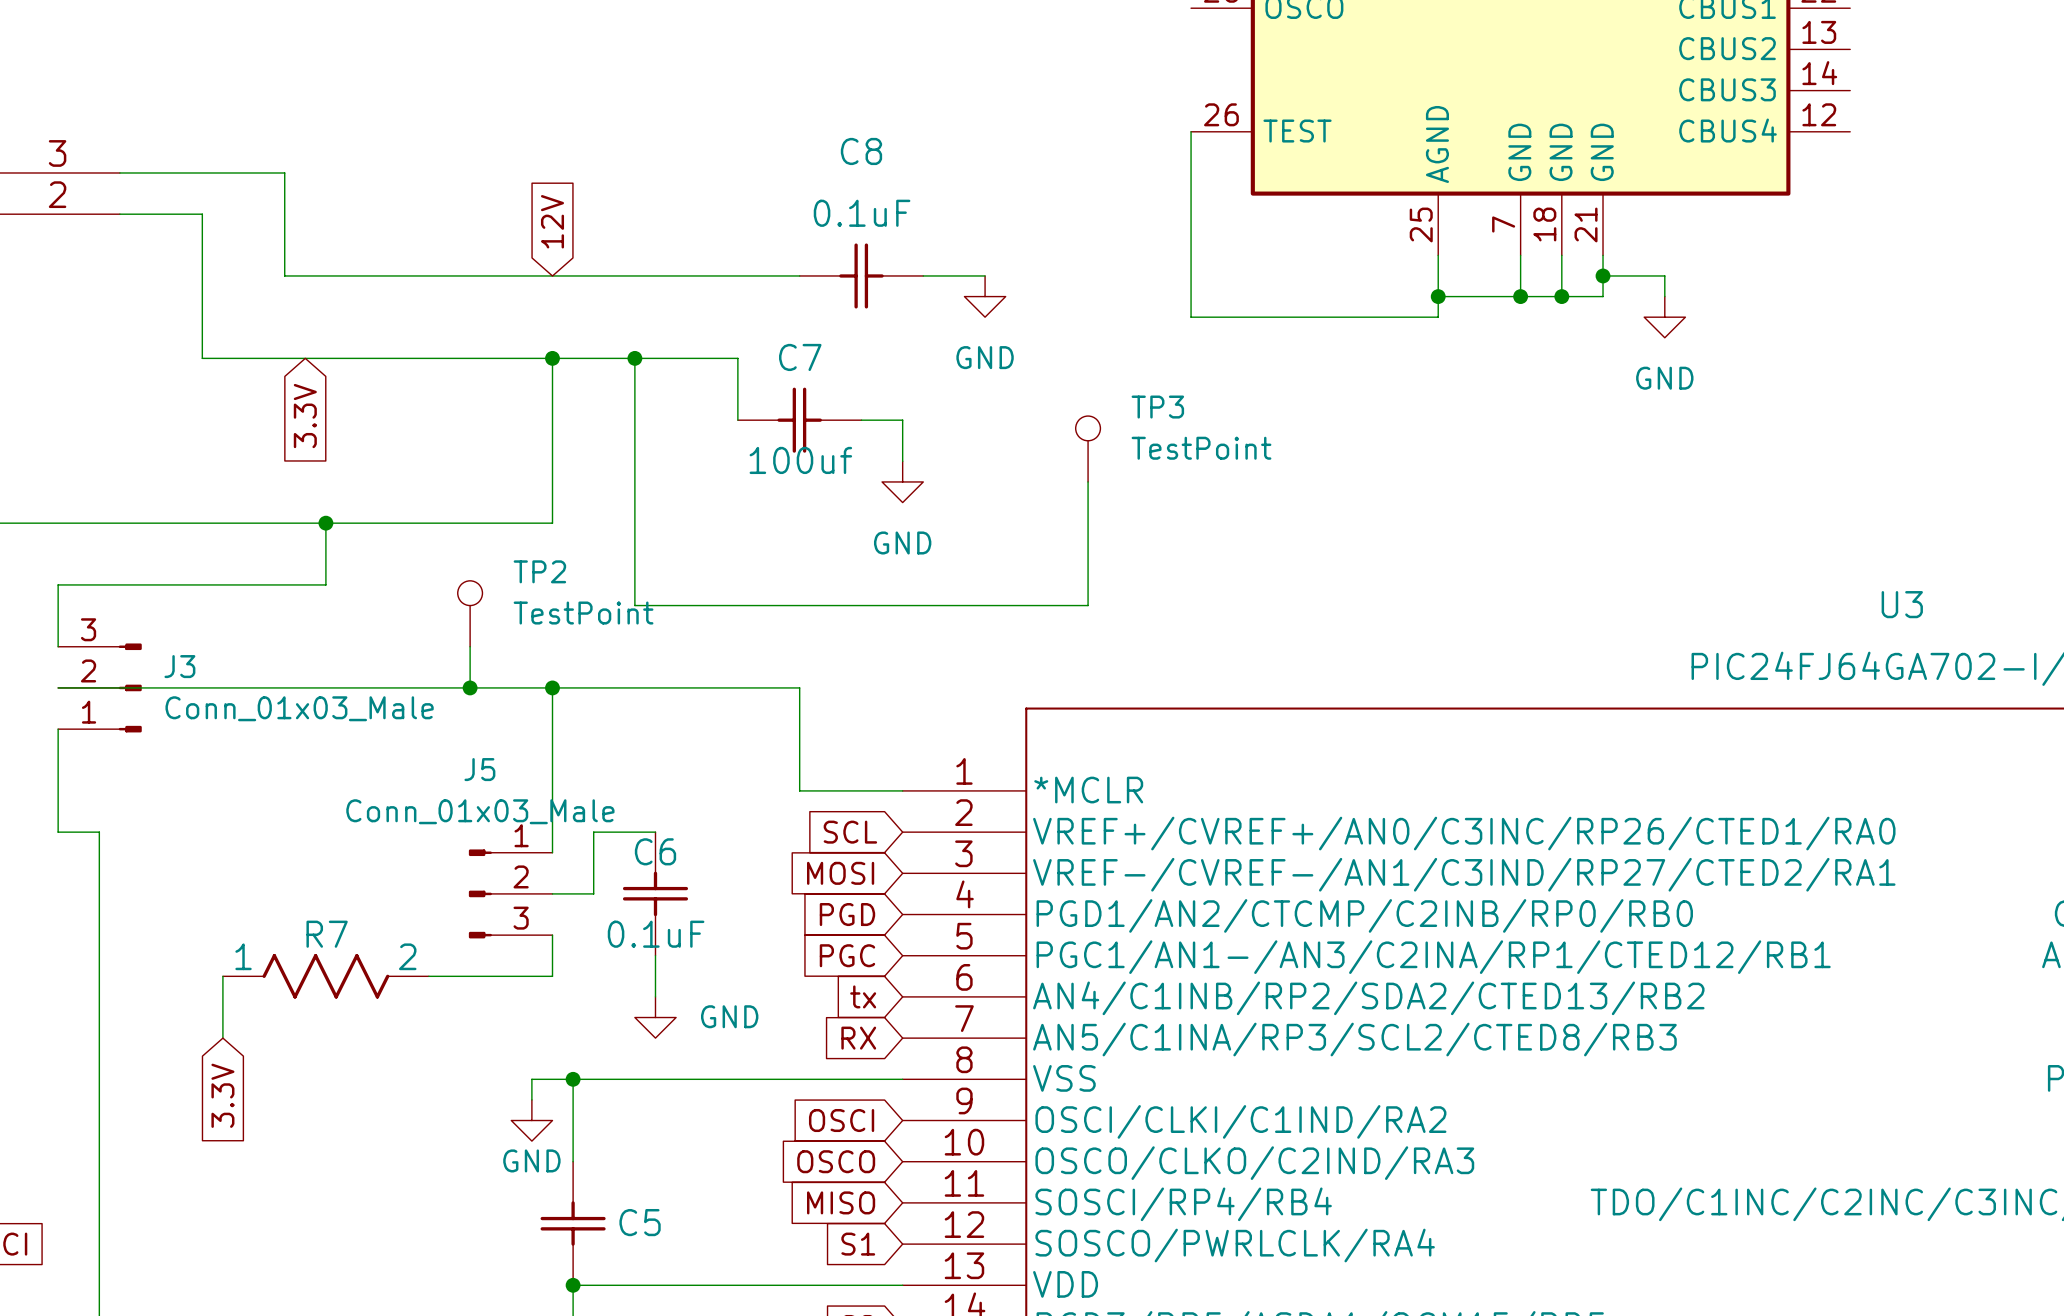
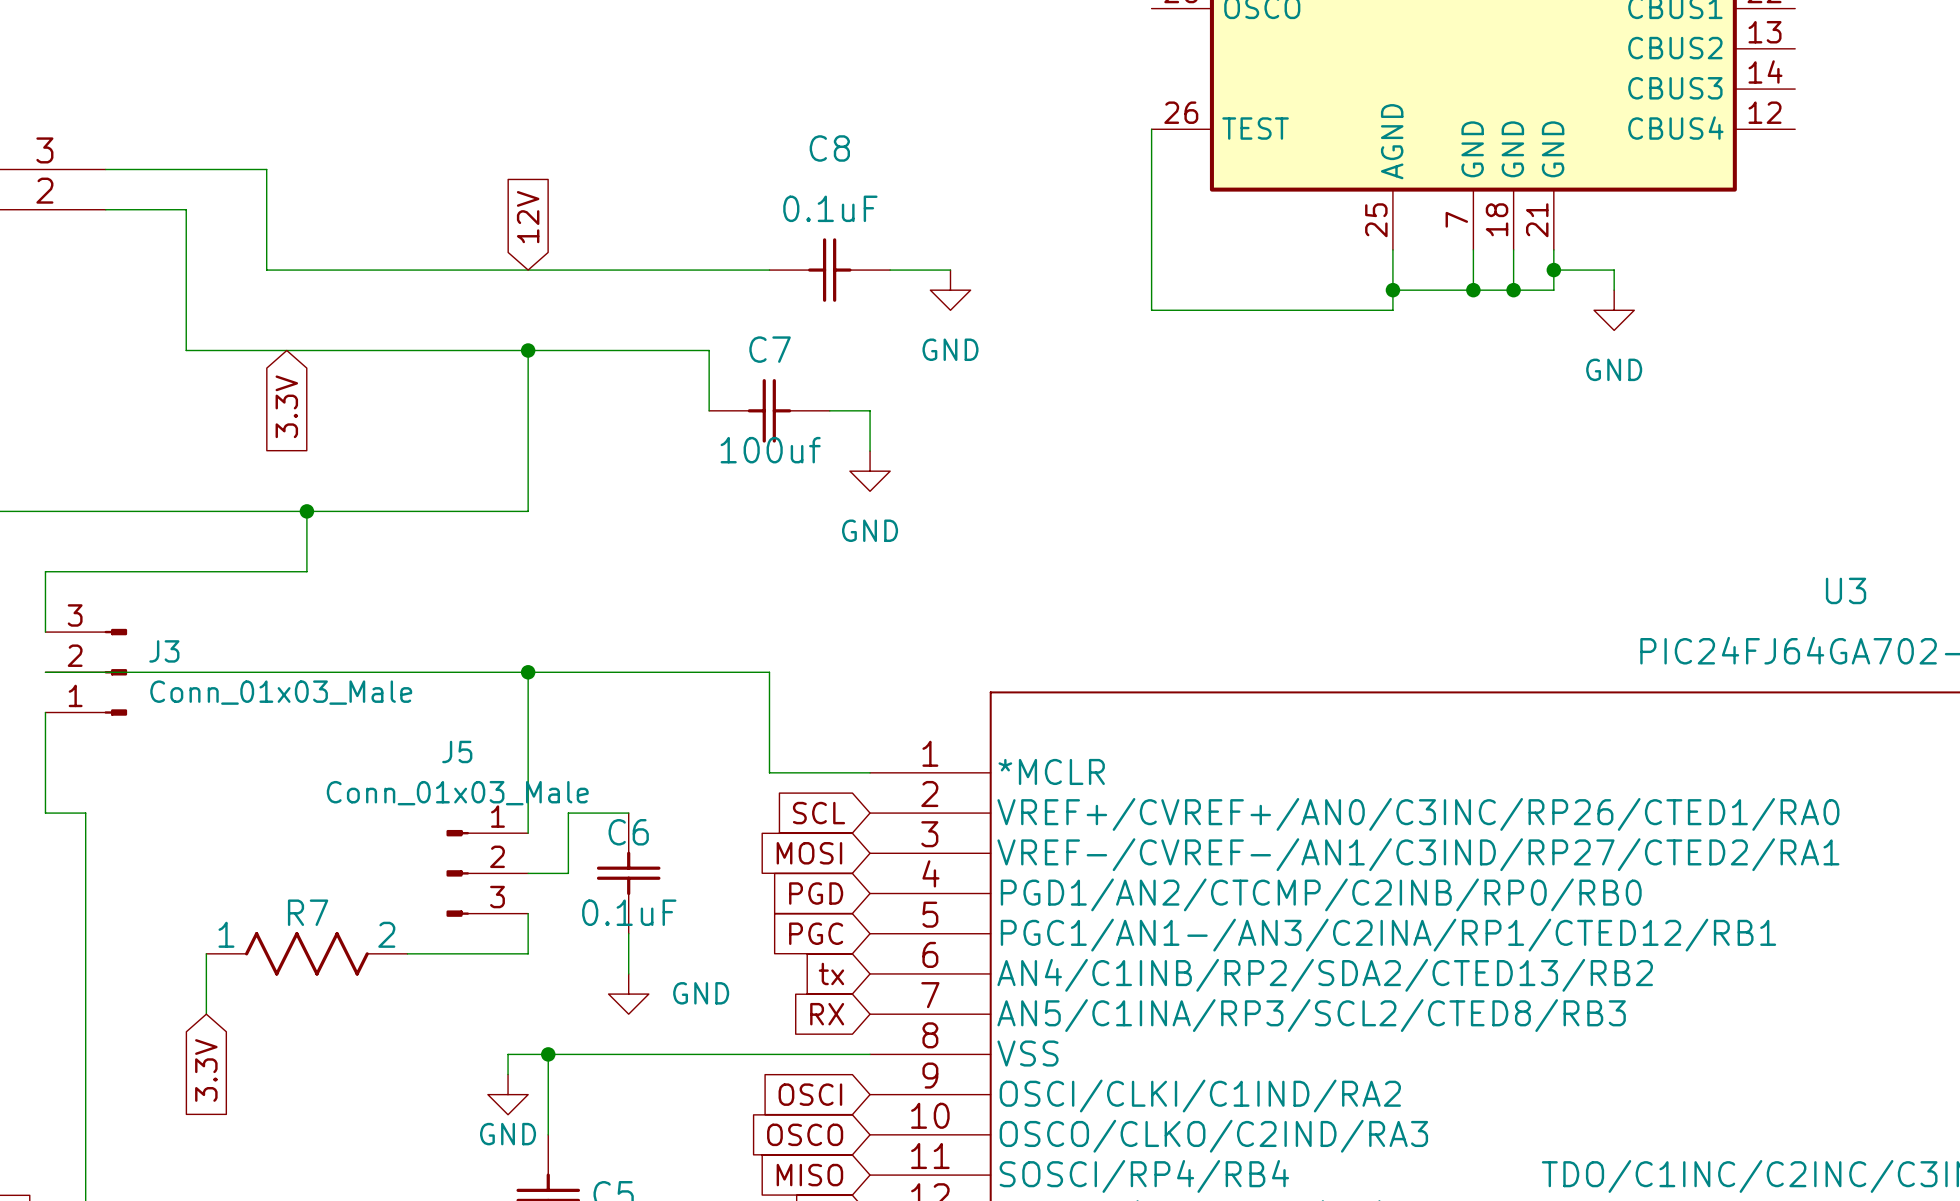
wire: (634, 358) (634, 605) (1088, 605) (1088, 481) -> none
junction: (634, 358) -> none
TP3: TestPoint (1088, 449) -> none
TP2: TestPoint (470, 613) -> none
wire: (470, 646) (470, 687) -> none
junction: (470, 687) -> none

